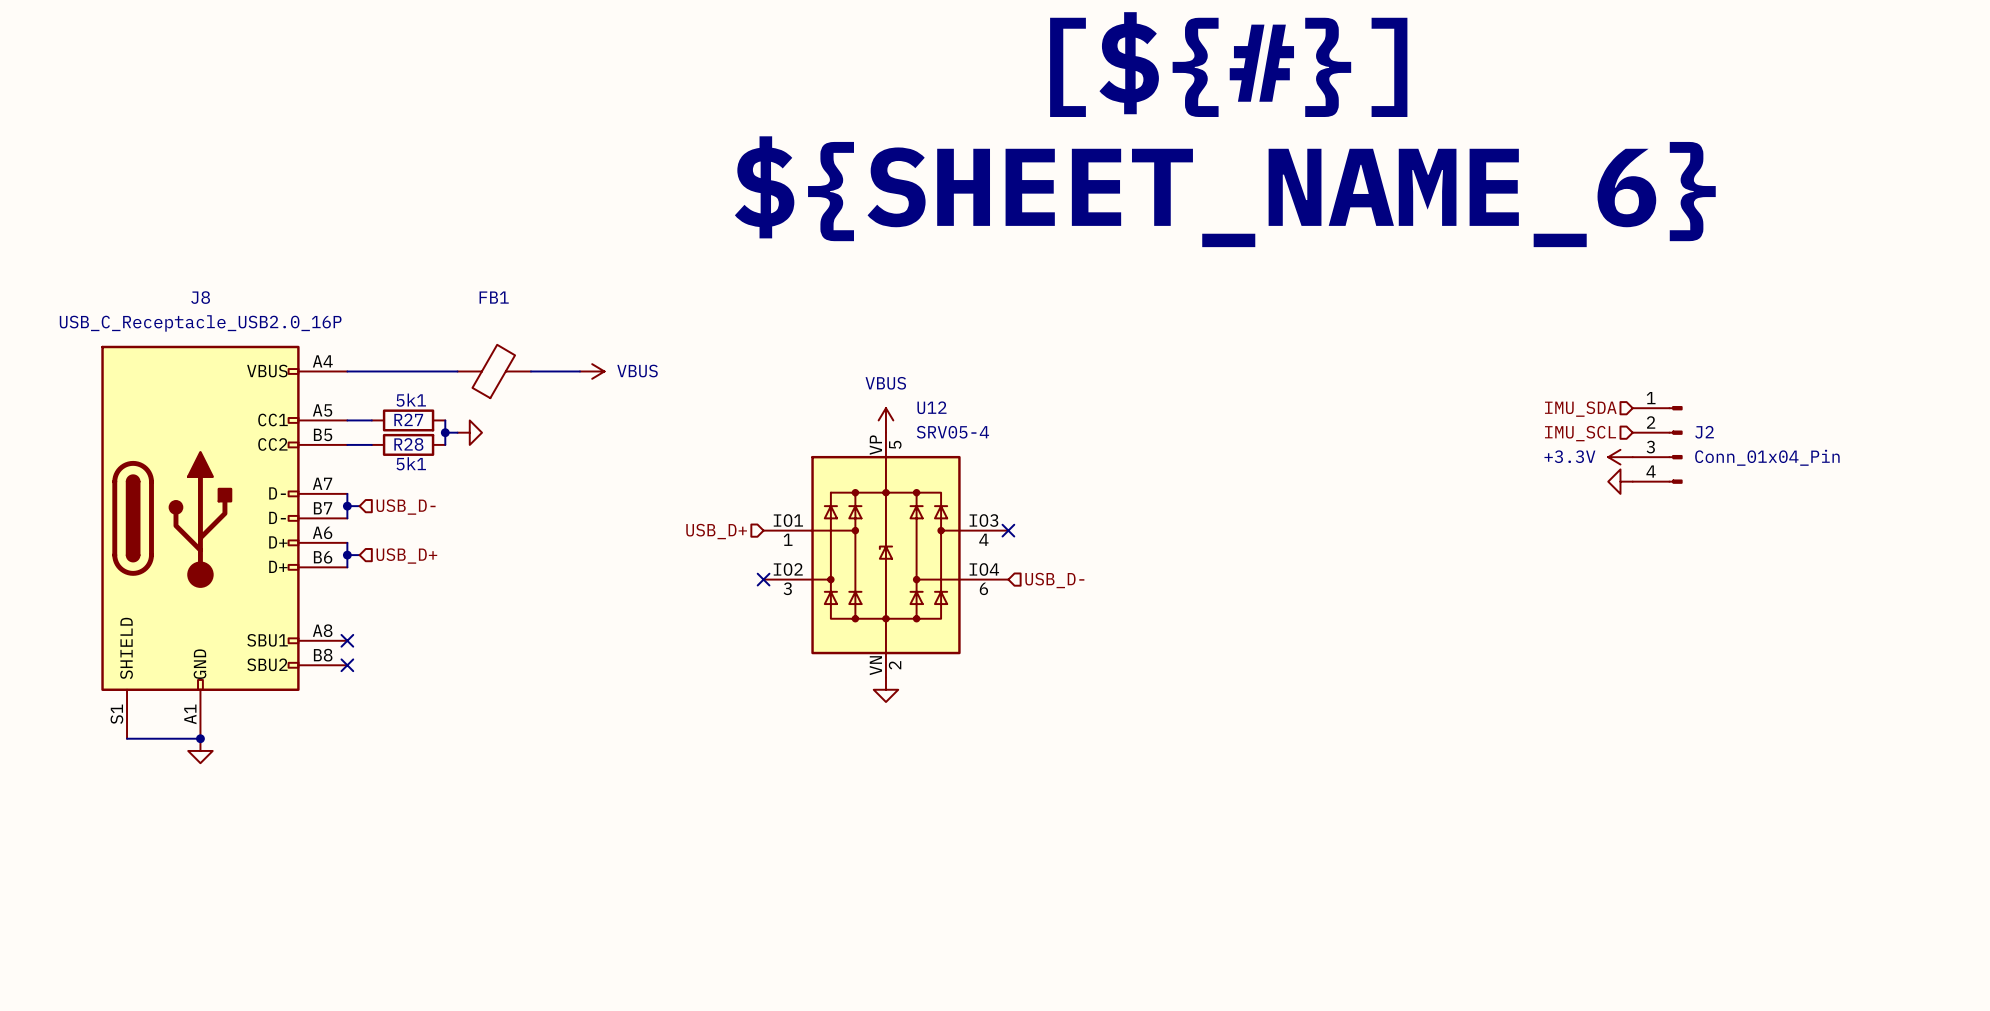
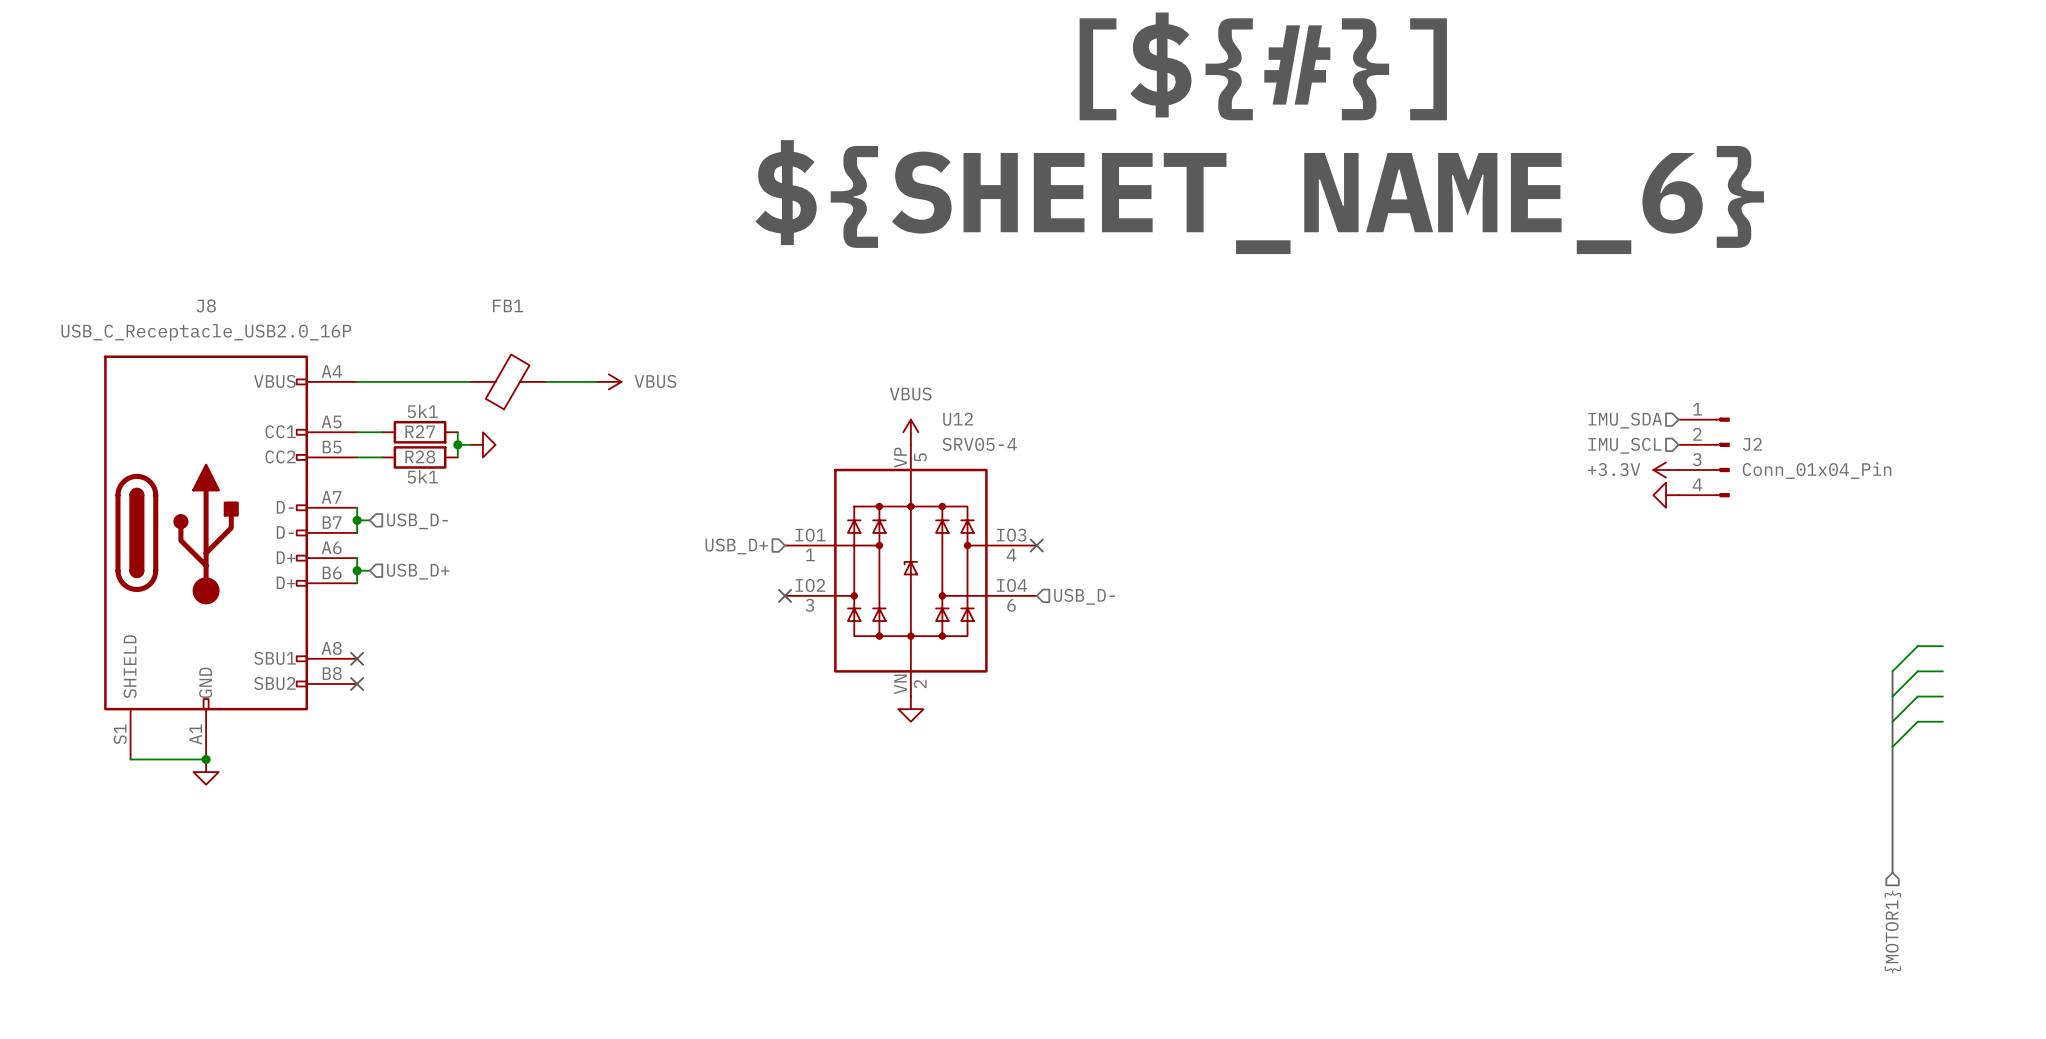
wire: none -> (1942, 646) (1917, 646) (1892, 671)
bus: none -> (1892, 671) (1892, 872)
wire: none -> (1942, 671) (1917, 671) (1892, 696)
wire: none -> (1942, 696) (1917, 696) (1892, 721)
wire: none -> (1942, 721) (1917, 721) (1892, 746)
hierarchical label: none -> {MOTOR1} (1892, 932)

